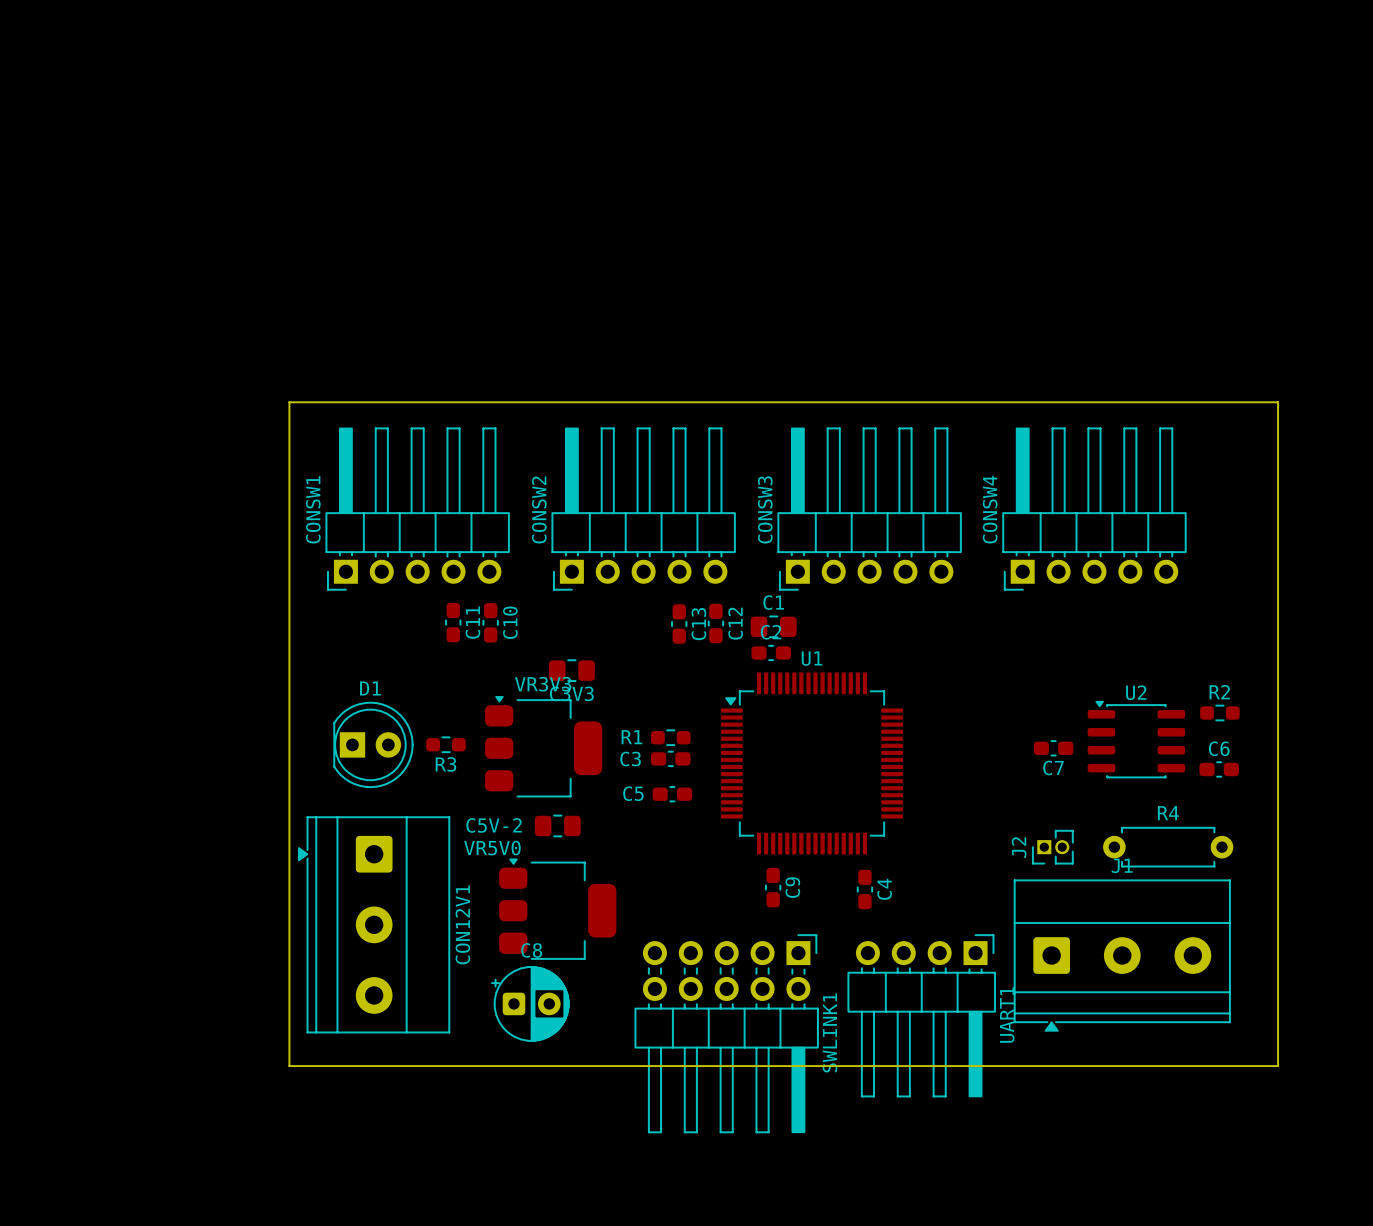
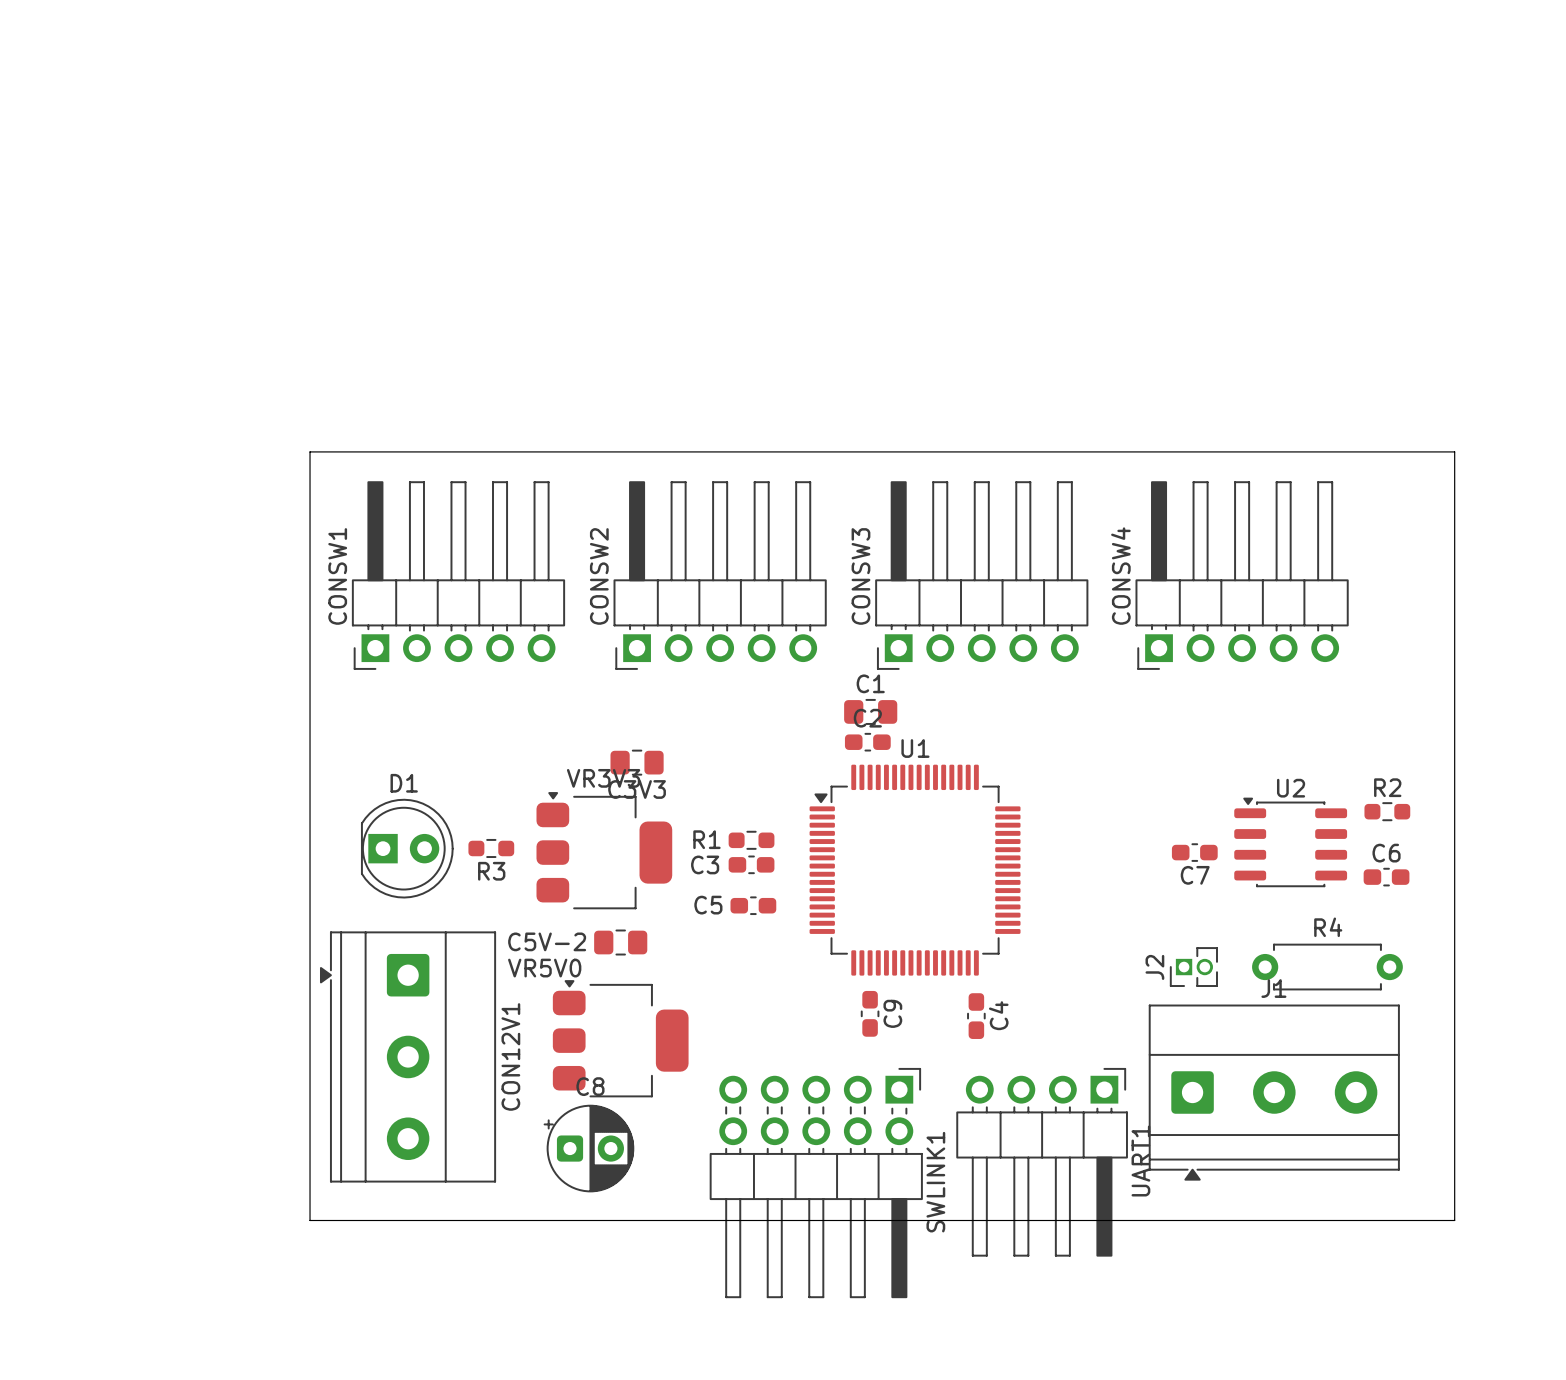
C11: (453, 622) -> none
C10: (490, 622) -> none
C12: (715, 623) -> none
C13: (679, 624) -> none

